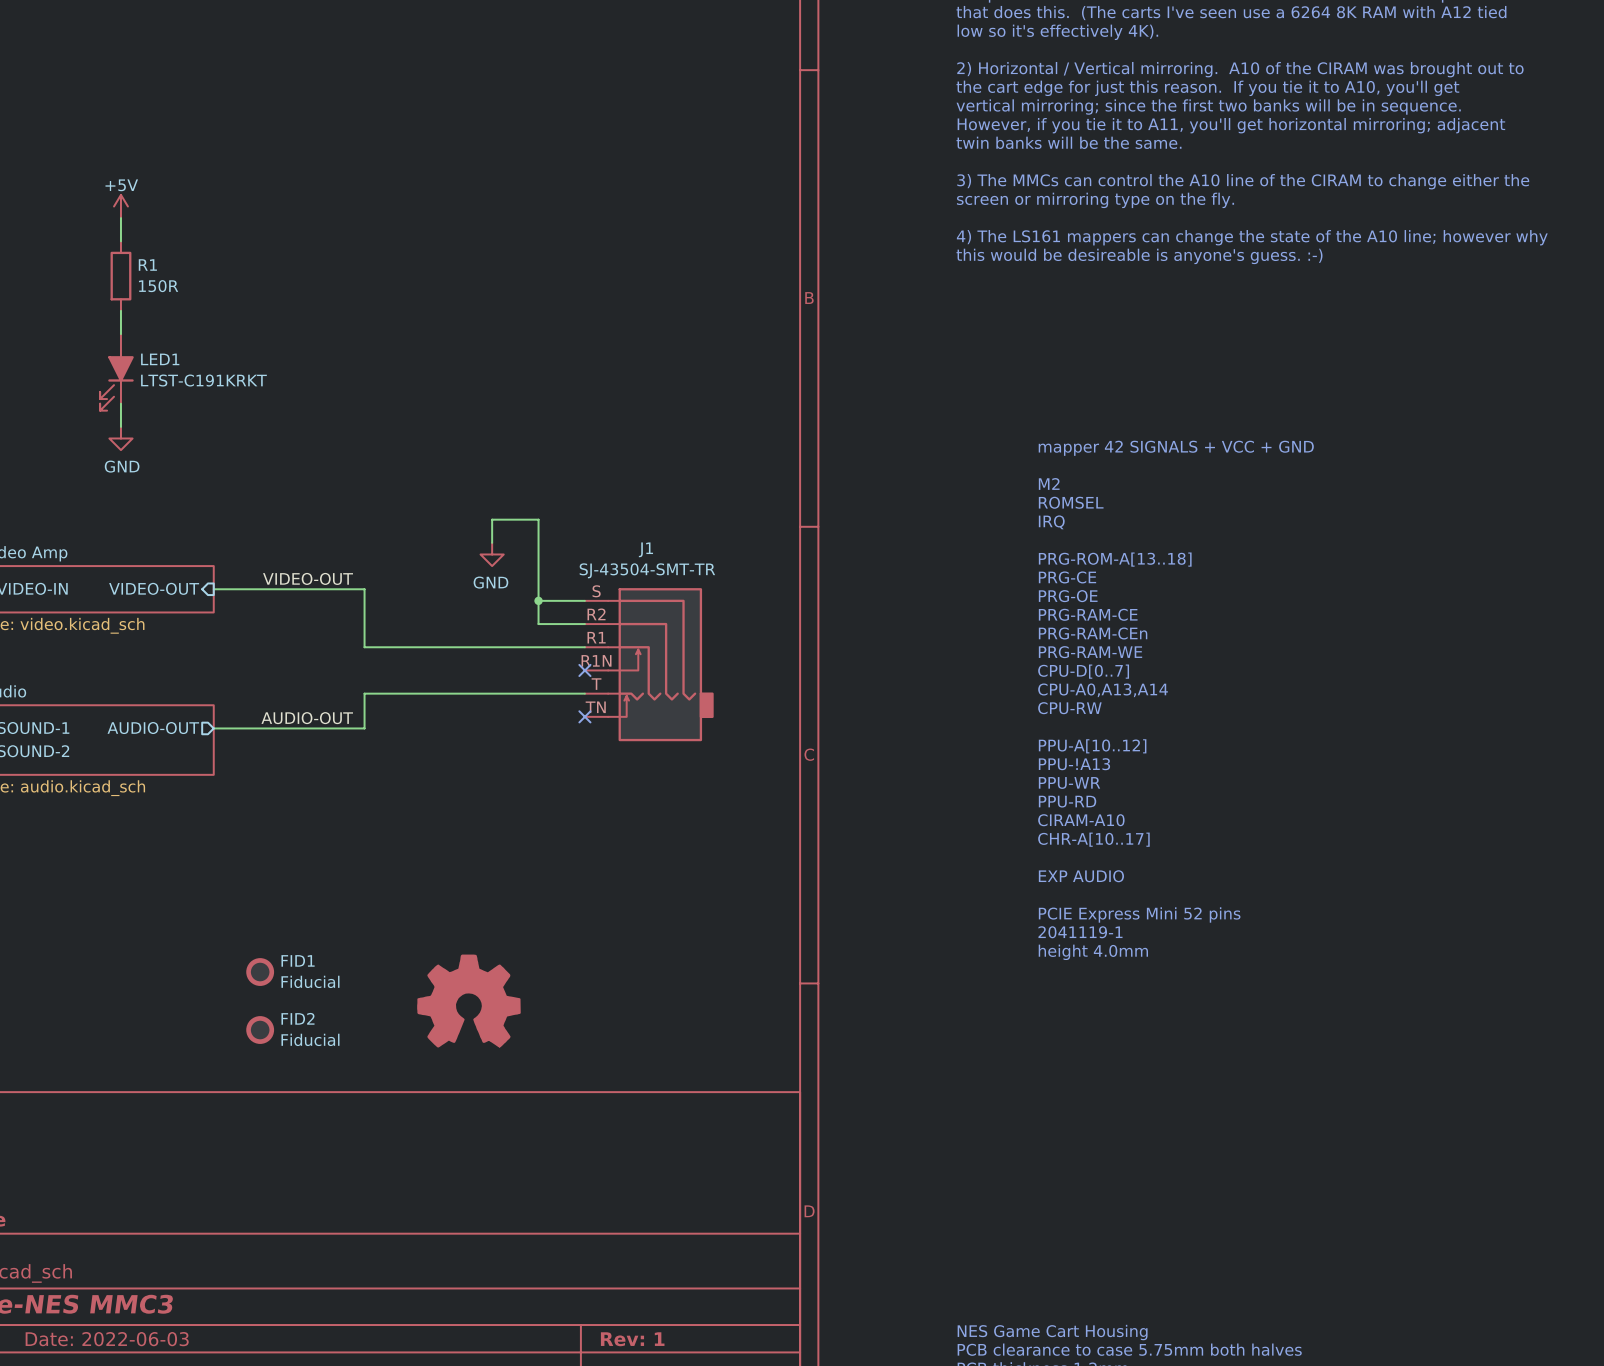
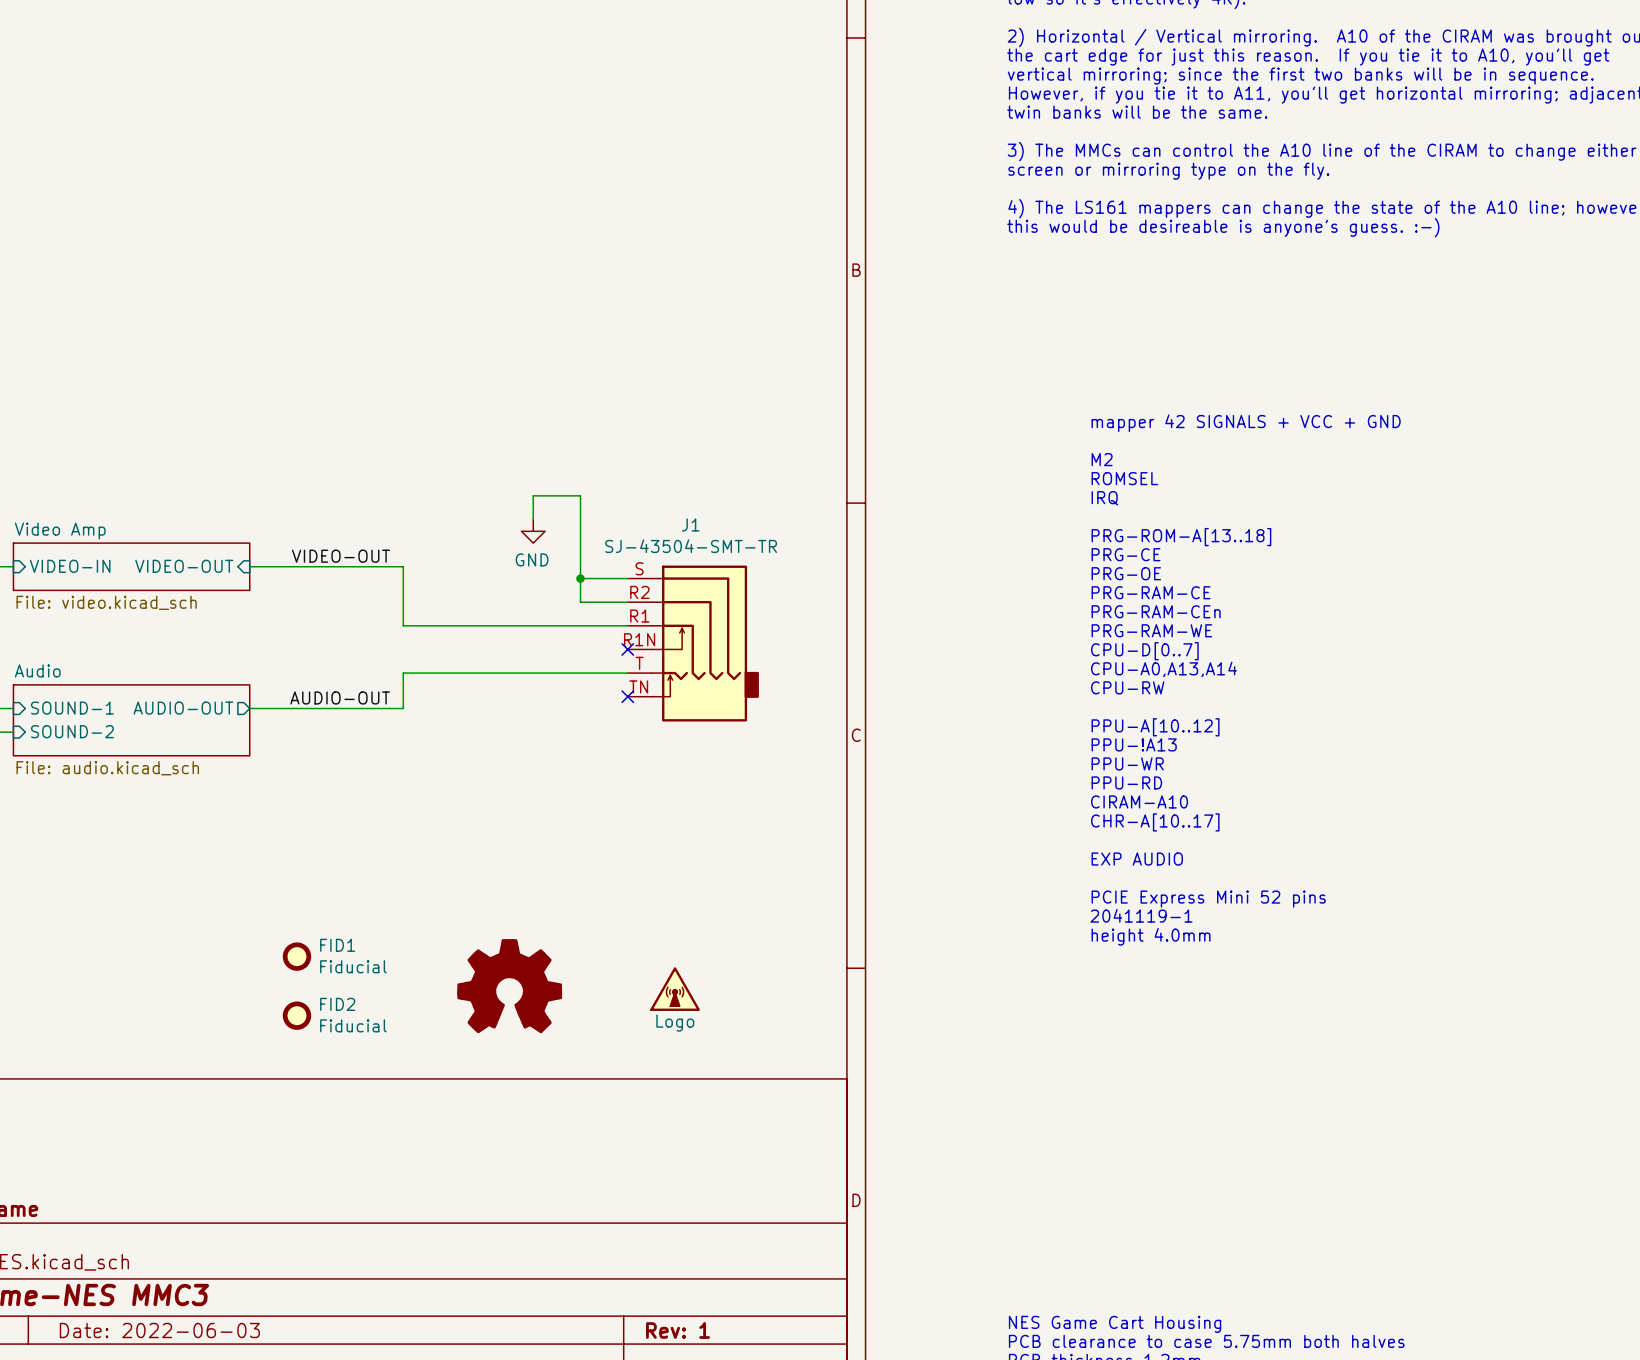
power symbol: +5V (120, 206) -> none
wire: (120, 218) (120, 241) -> none
R1: 150R (120, 276) -> none
wire: (120, 310) (120, 334) -> none
LED1: LTST-C191KRKT (116, 372) -> none
wire: (120, 403) (120, 426) -> none
power symbol: GND (120, 438) -> none
part: none -> Logo (675, 989)

